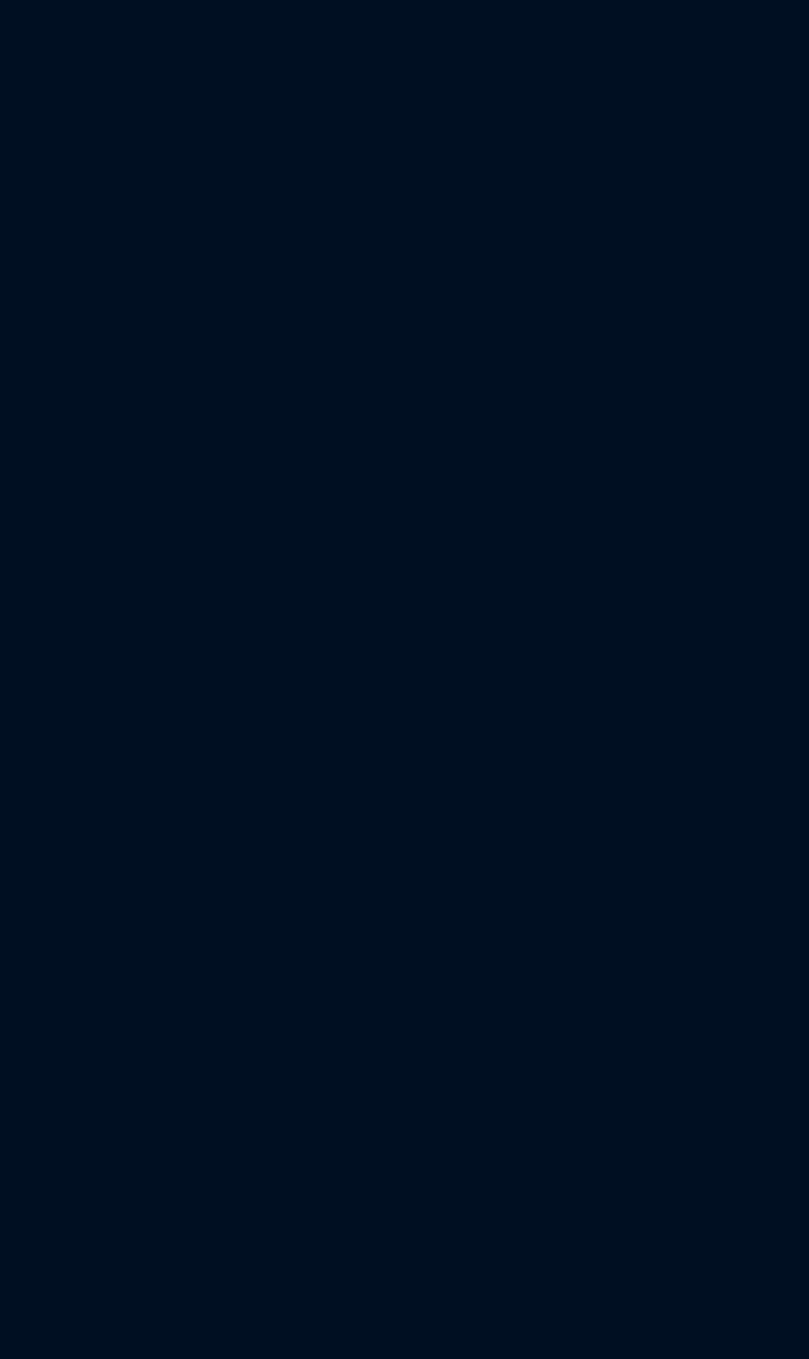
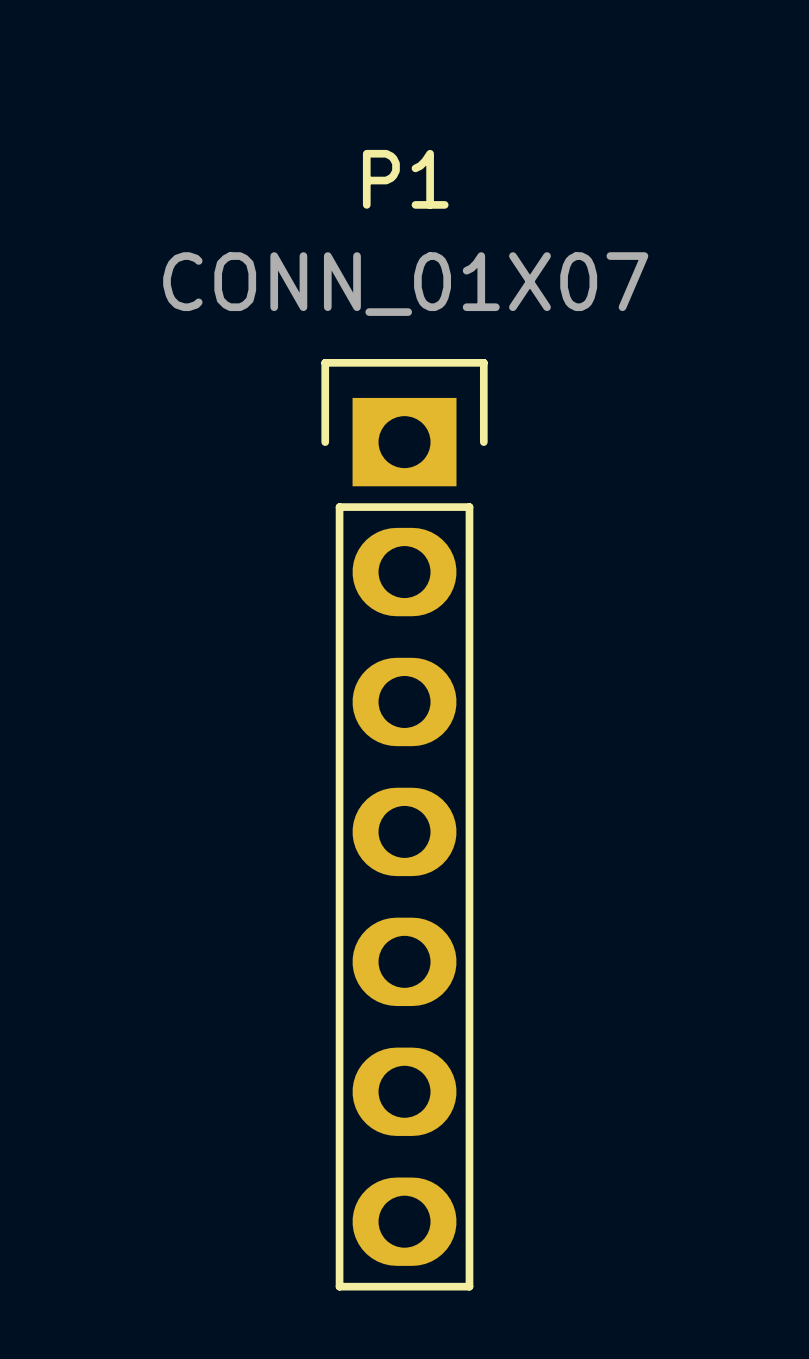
P1: none -> CONN_01X07 (404, 824)

